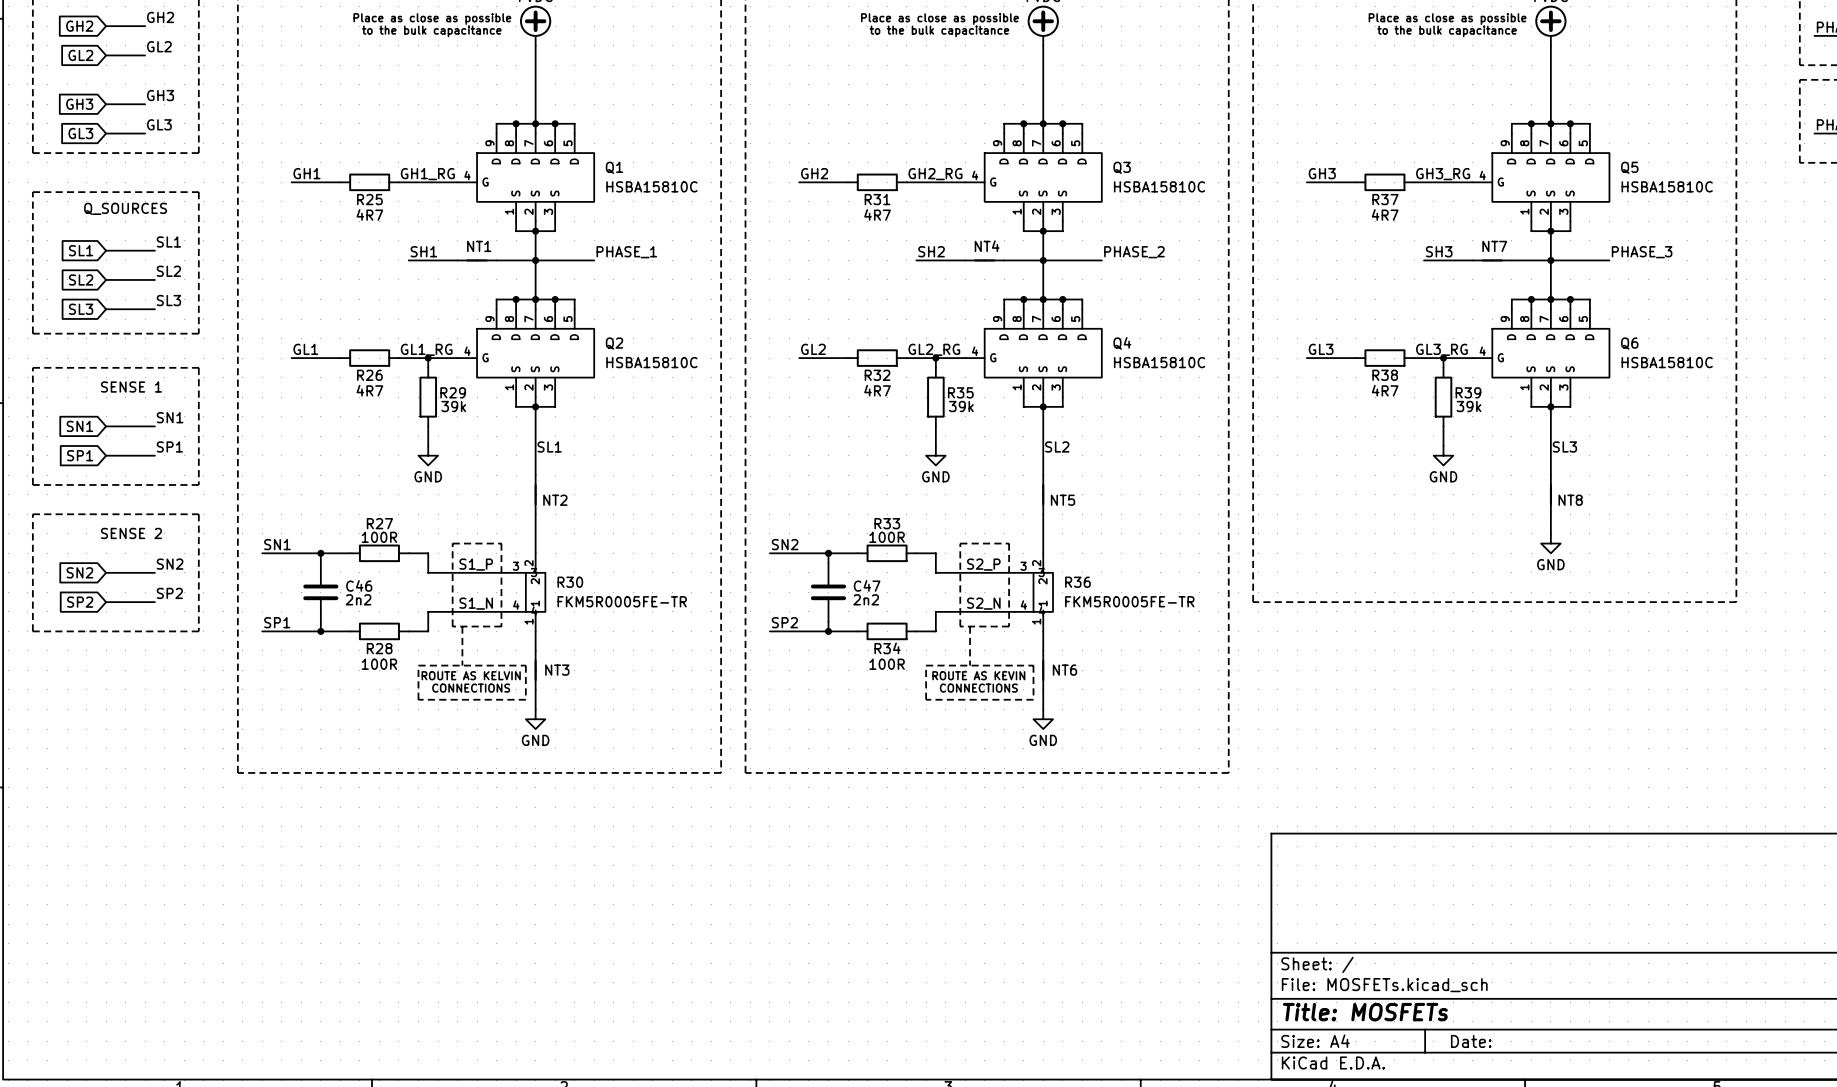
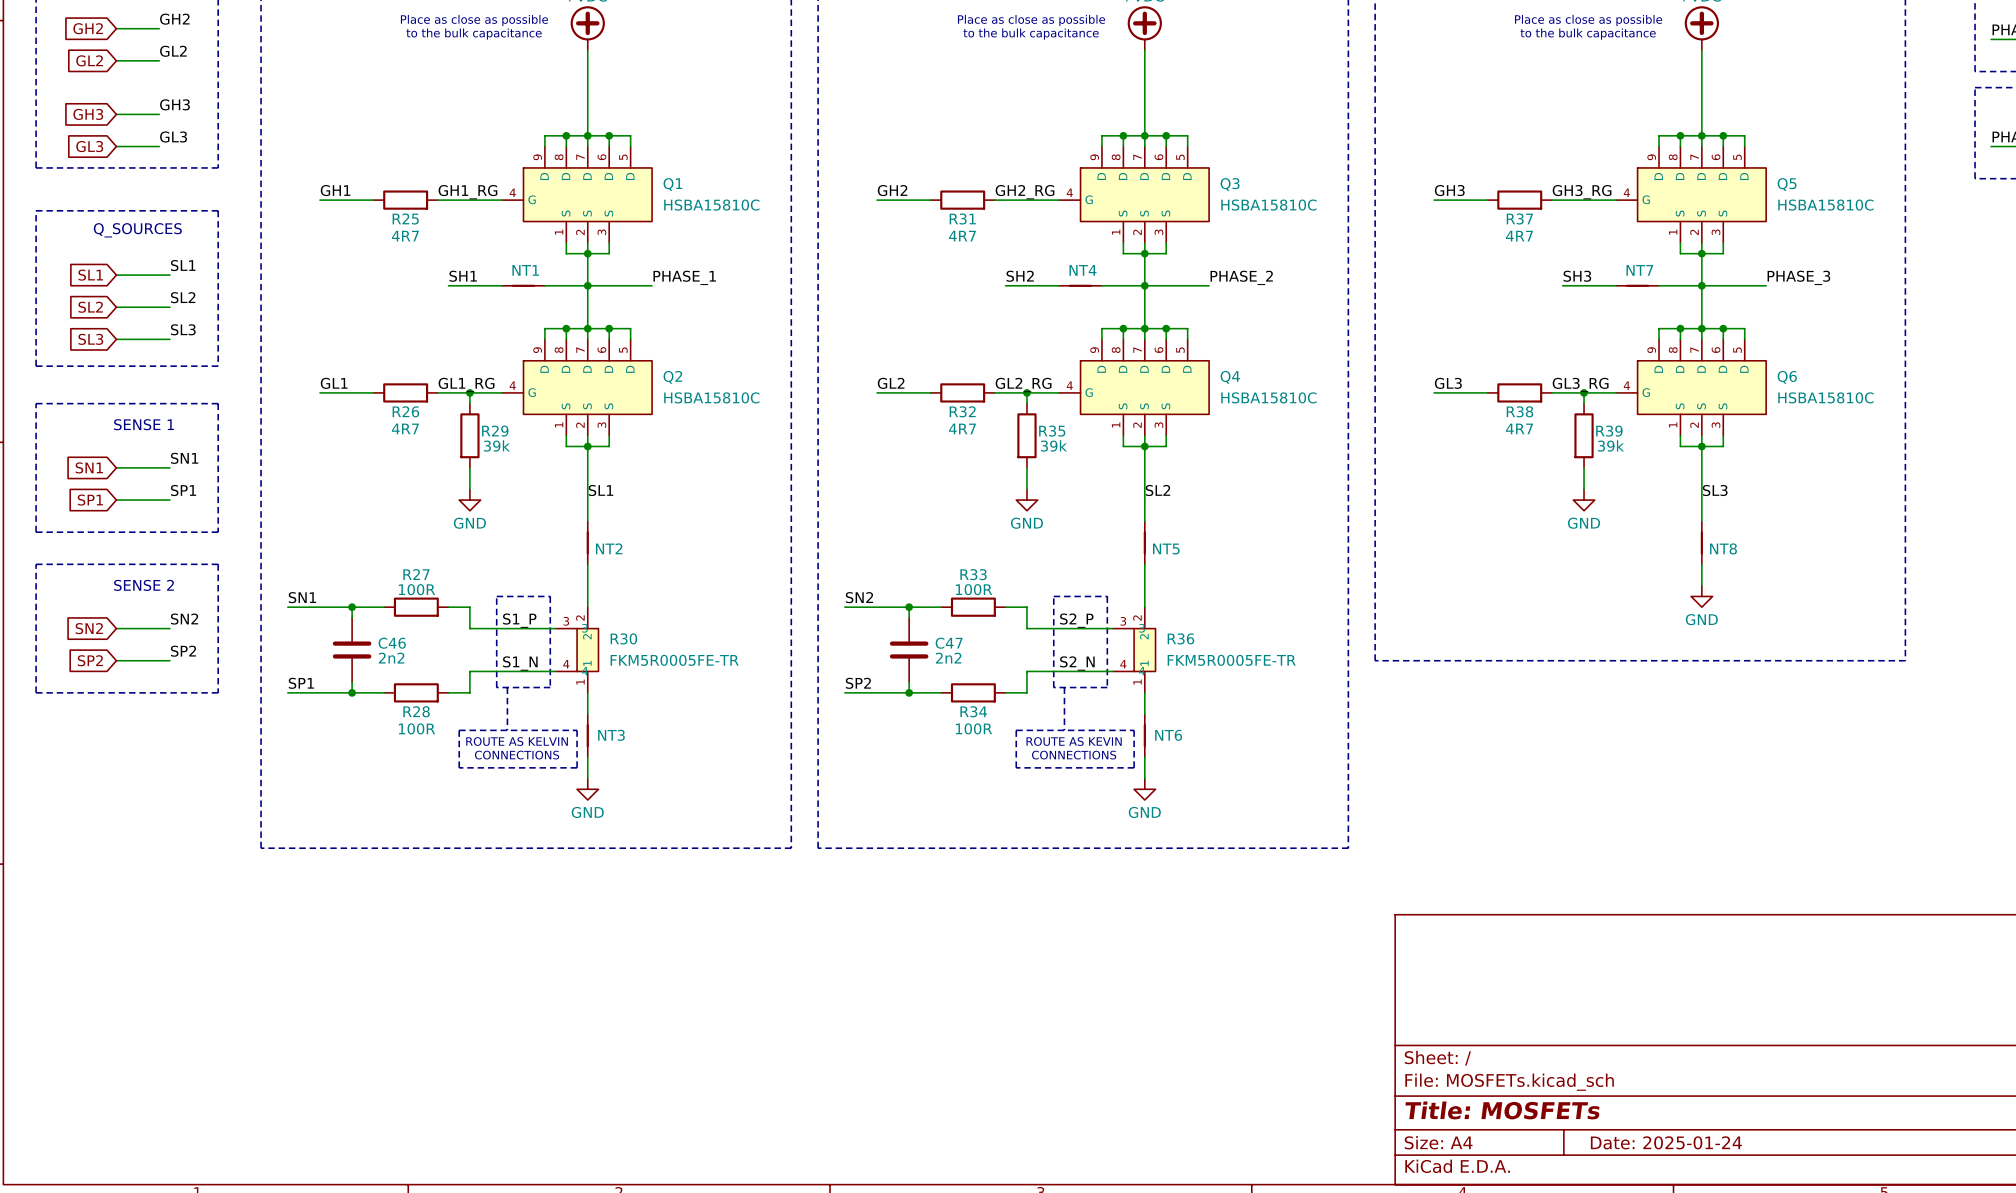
title block: Date: (1471, 1041) -> Date: 2025-01-24 (1666, 1142)

